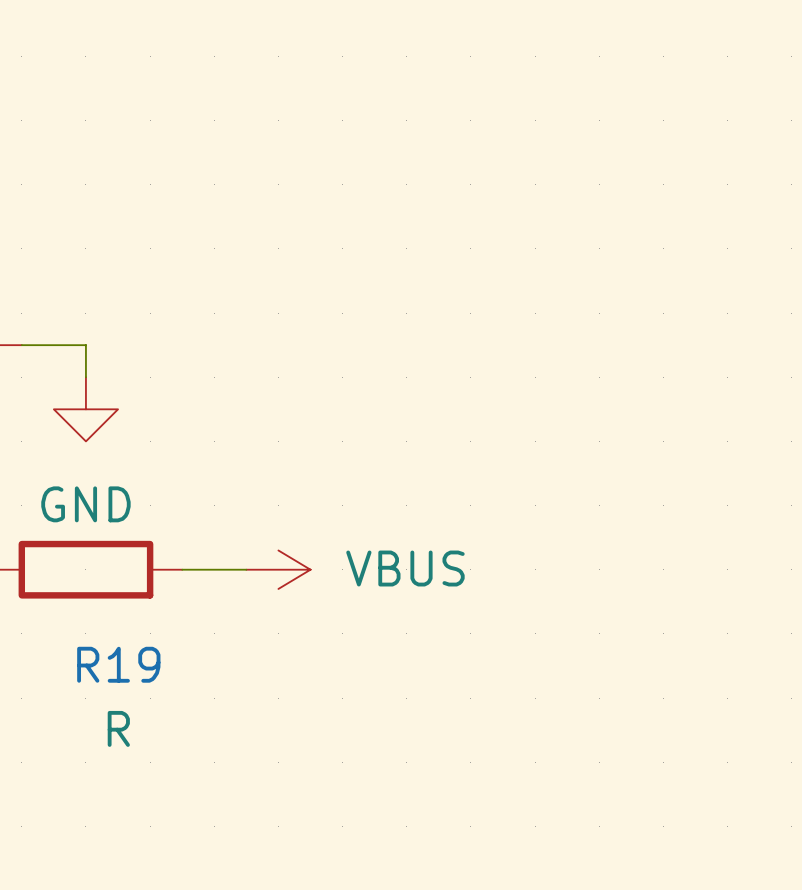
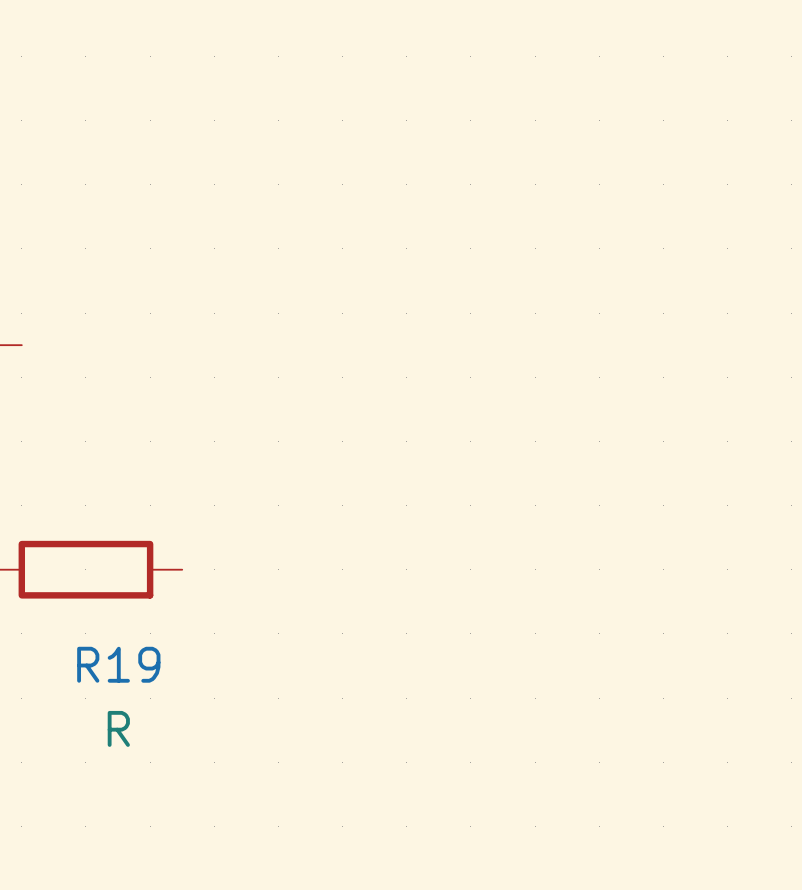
wire: (21, 345) (85, 345) (85, 377) -> none
power symbol: GND (85, 409) -> none
wire: (182, 569) (246, 569) -> none
power symbol: VBUS (278, 569) -> none

